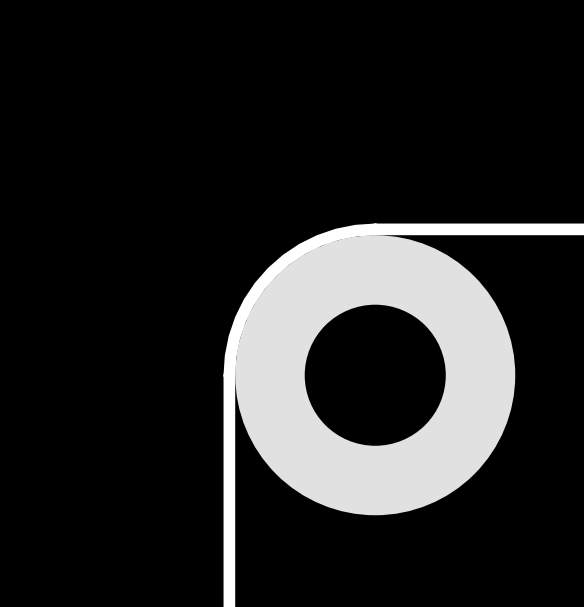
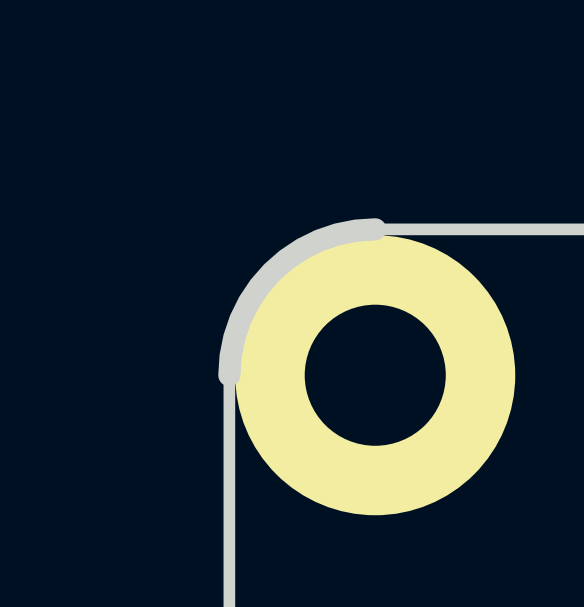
board edge width: thin (375, 229) (356, 230) (319, 240) (286, 259) (272, 272) (259, 286) (240, 319) (230, 356) (229, 375) -> thick (375, 229) (356, 230) (319, 240) (286, 259) (272, 272) (259, 286) (240, 319) (230, 356) (229, 375)

